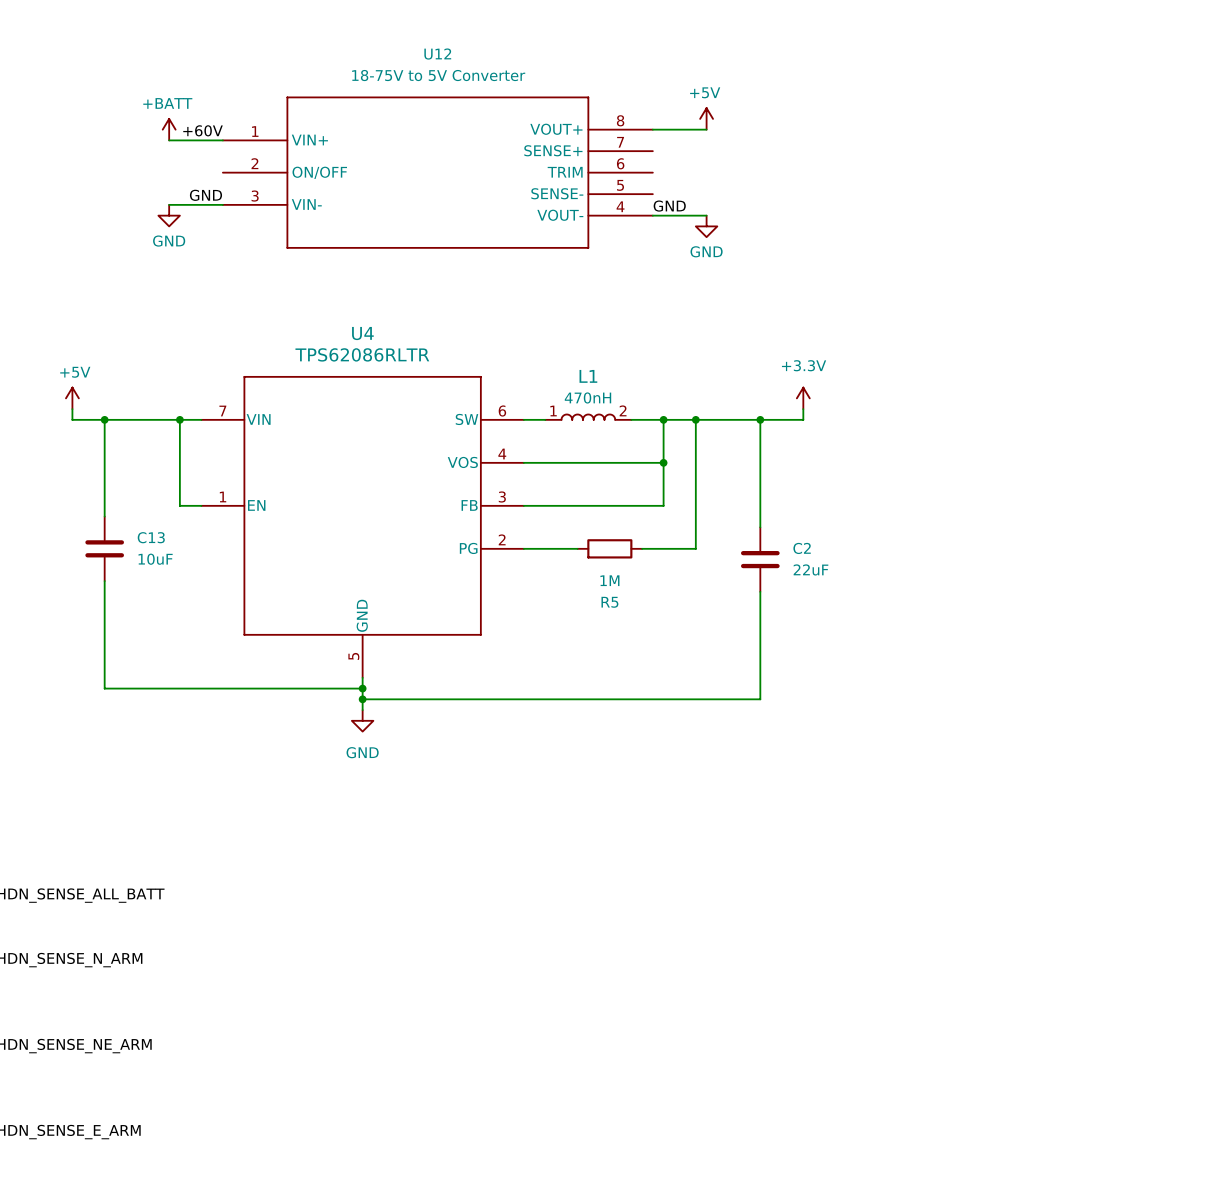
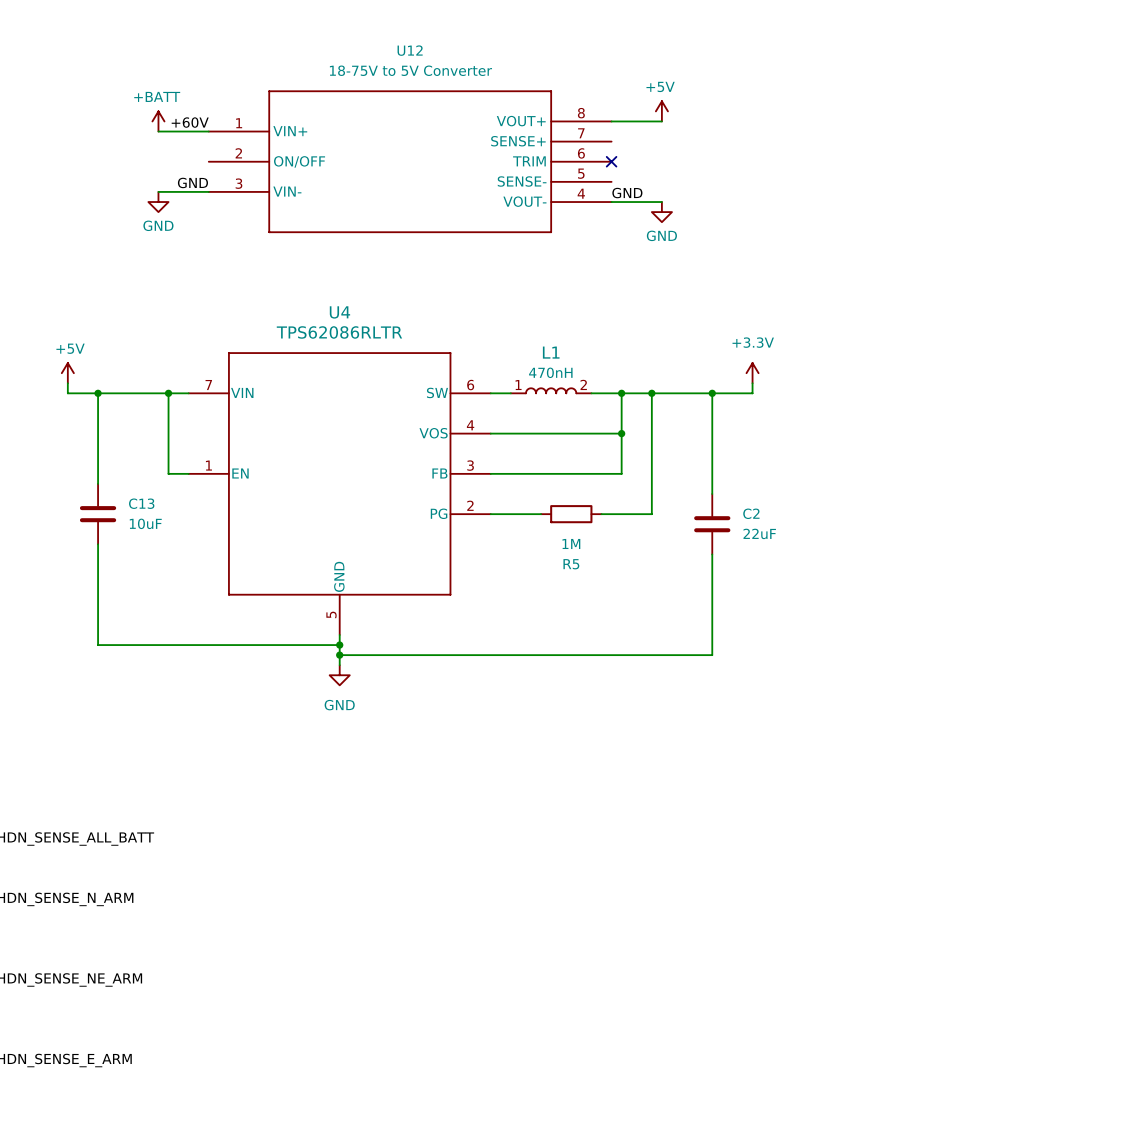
no-connect mark: none -> (611, 161)

